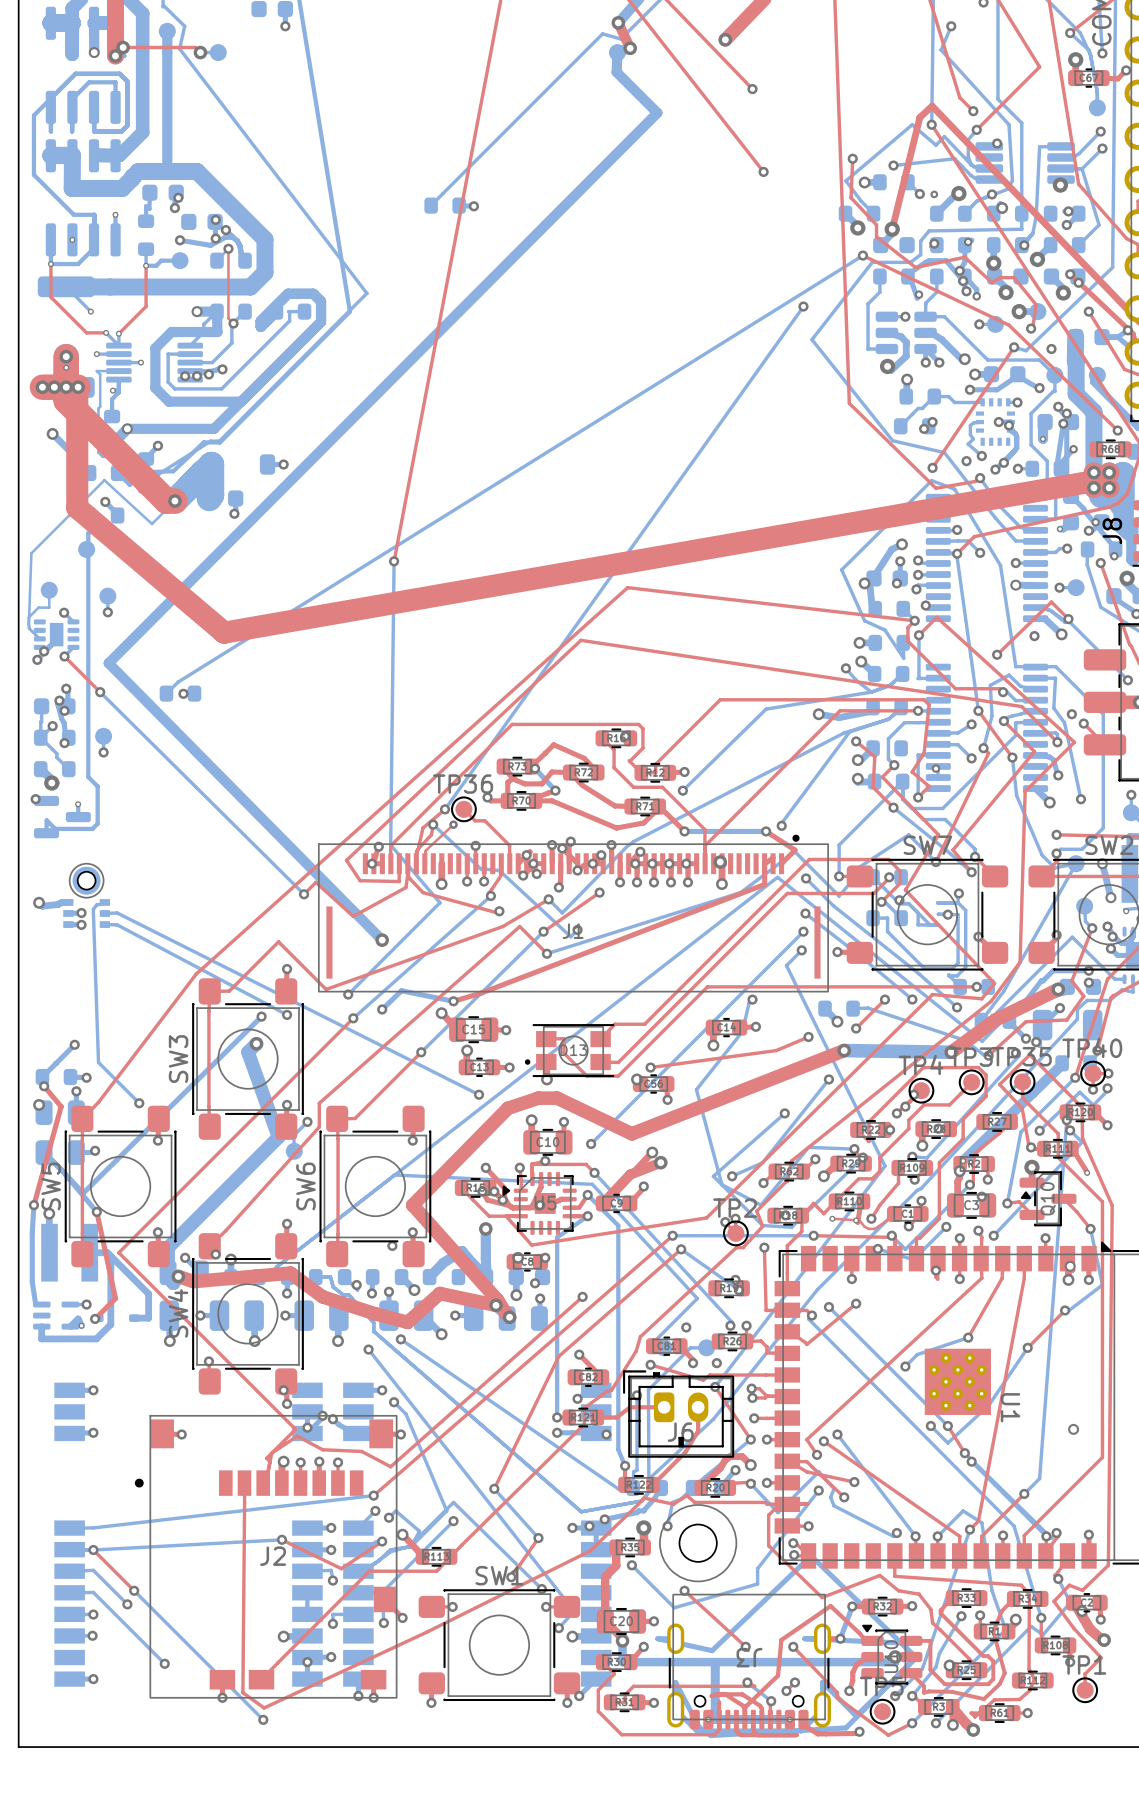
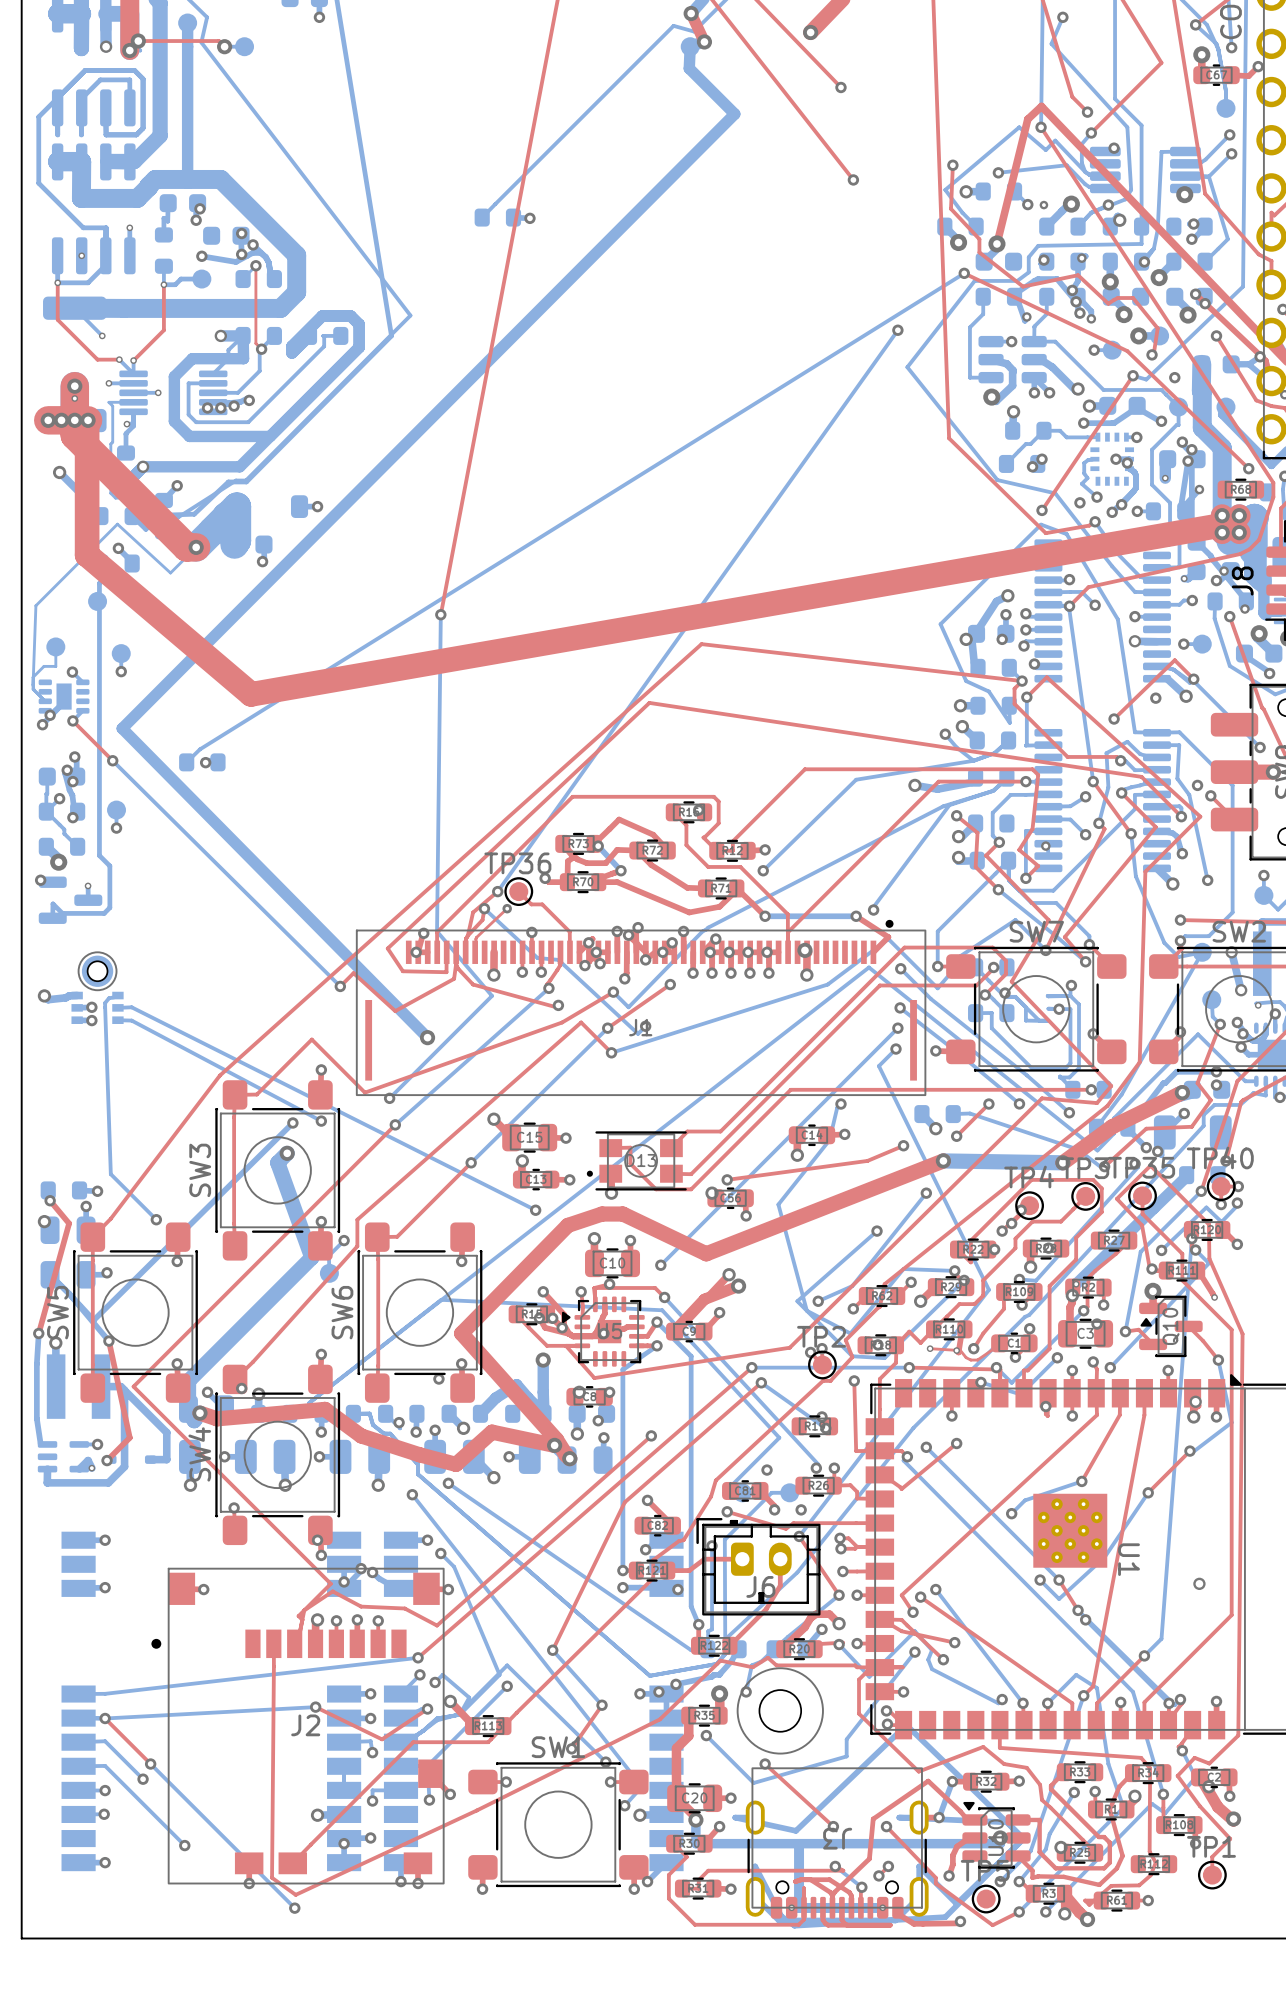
top track: (772, 858) (764, 863) (764, 884) (481, 993) (453, 1001) -> none
bottom track: (453, 1001) (401, 990) (382, 1009) -> none
via: (453, 1001) -> none
via: (382, 1009) -> none
bottom track: (74, 1044) (42, 1076) -> none
via: (74, 1044) -> none

